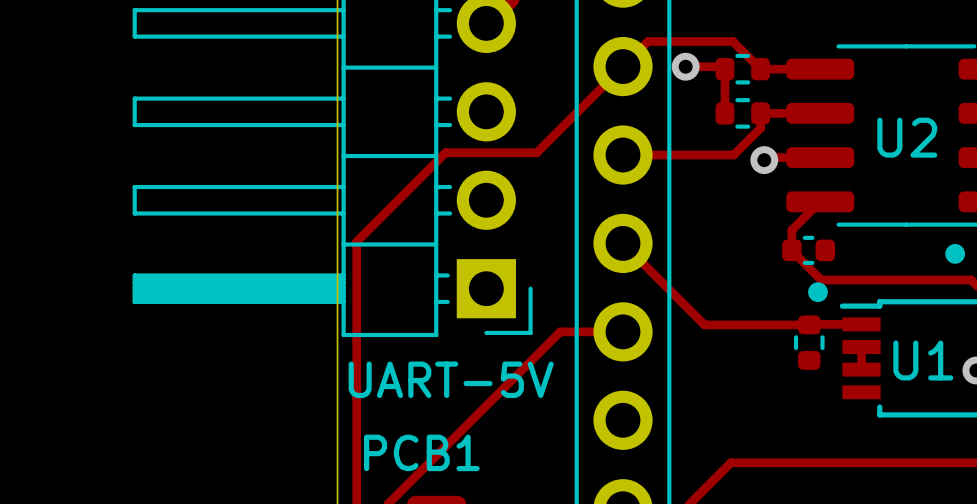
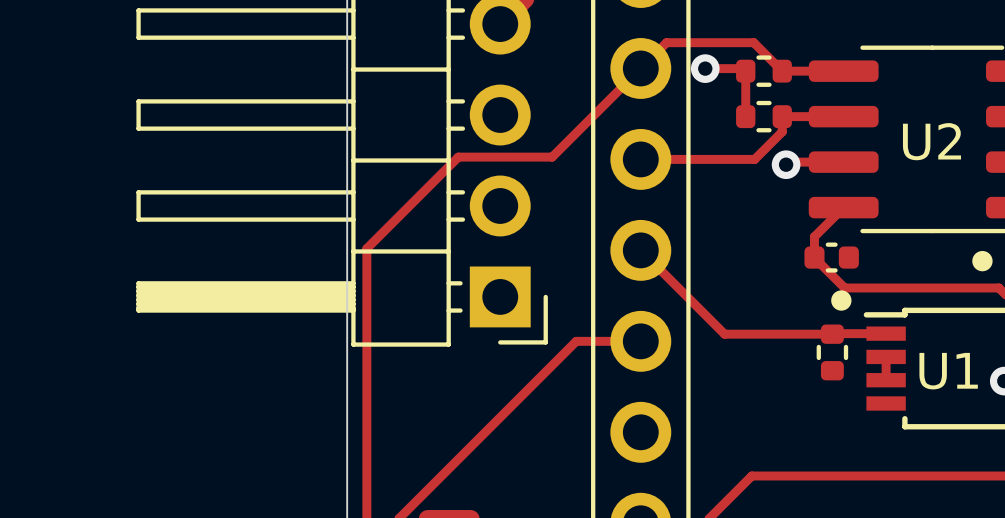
text: UART-5V (451, 379) -> none
text: PCB1 (421, 452) -> none

